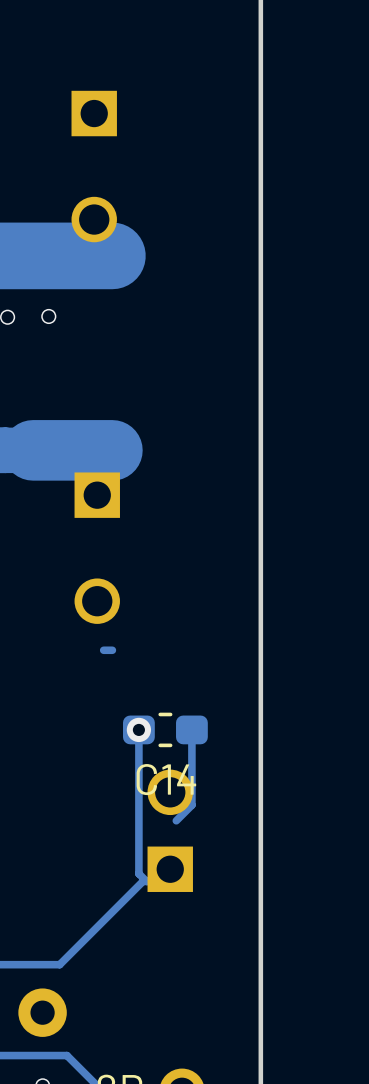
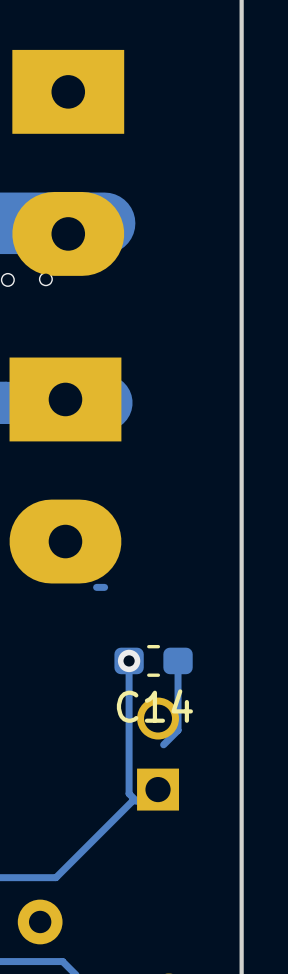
part: (94, 166) -> none
part: none -> (68, 162)
part: none -> (65, 470)
part: (97, 548) -> none

